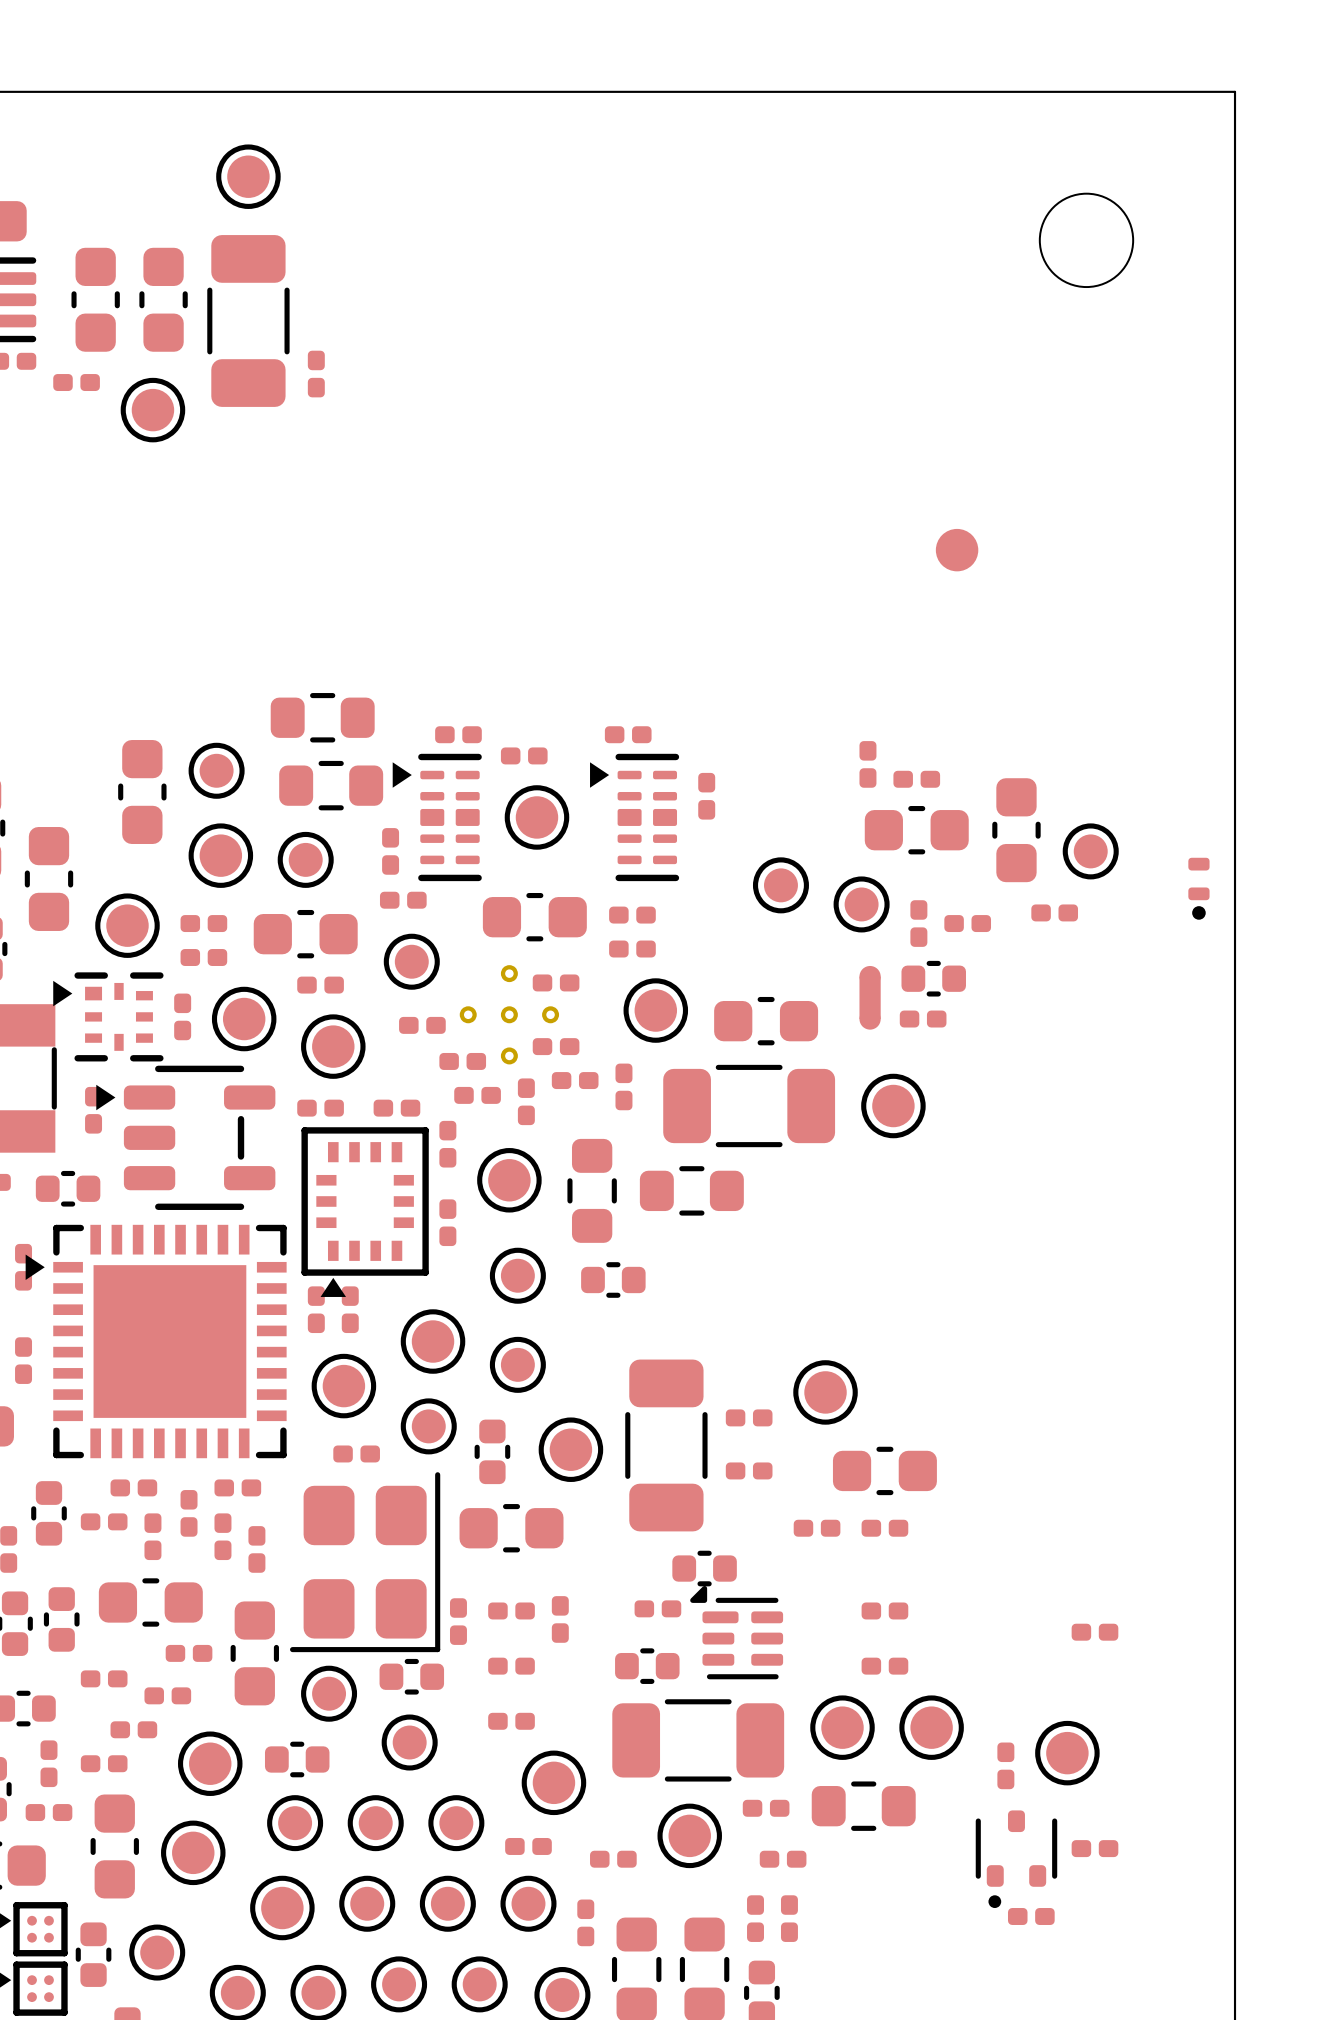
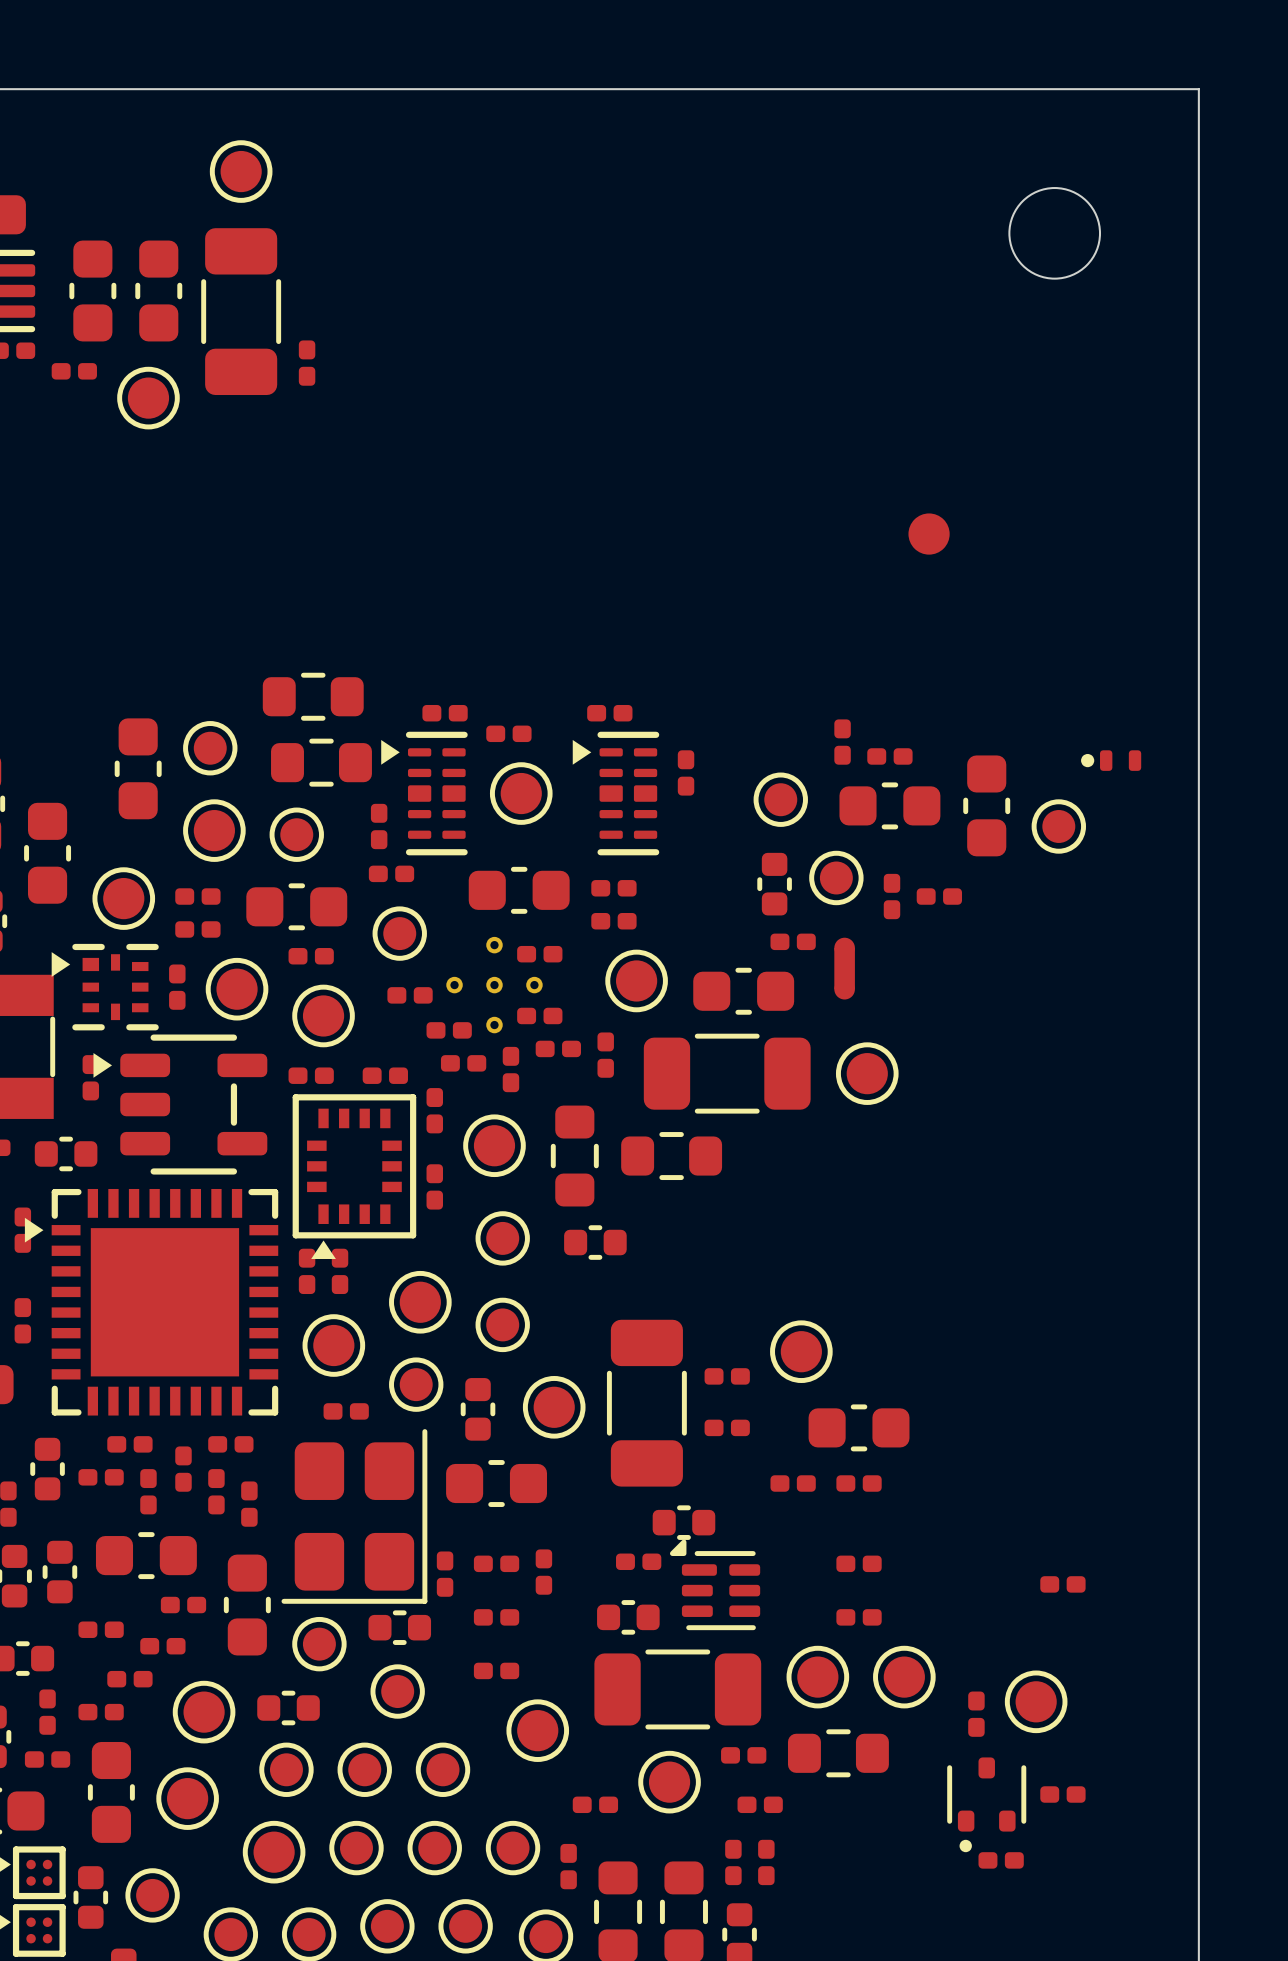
part: none -> (780, 799)
part footprint: [752, 857, 809, 914] -> [757, 852, 792, 916]
part rotation: 0° (1198, 888) -> 90° clockwise (1111, 760)
part position: (1198, 888) -> (1111, 760)
part: (1054, 912) -> none
part: (933, 978) -> none
part position: (923, 1019) -> (793, 941)
part: (528, 1846) -> none

